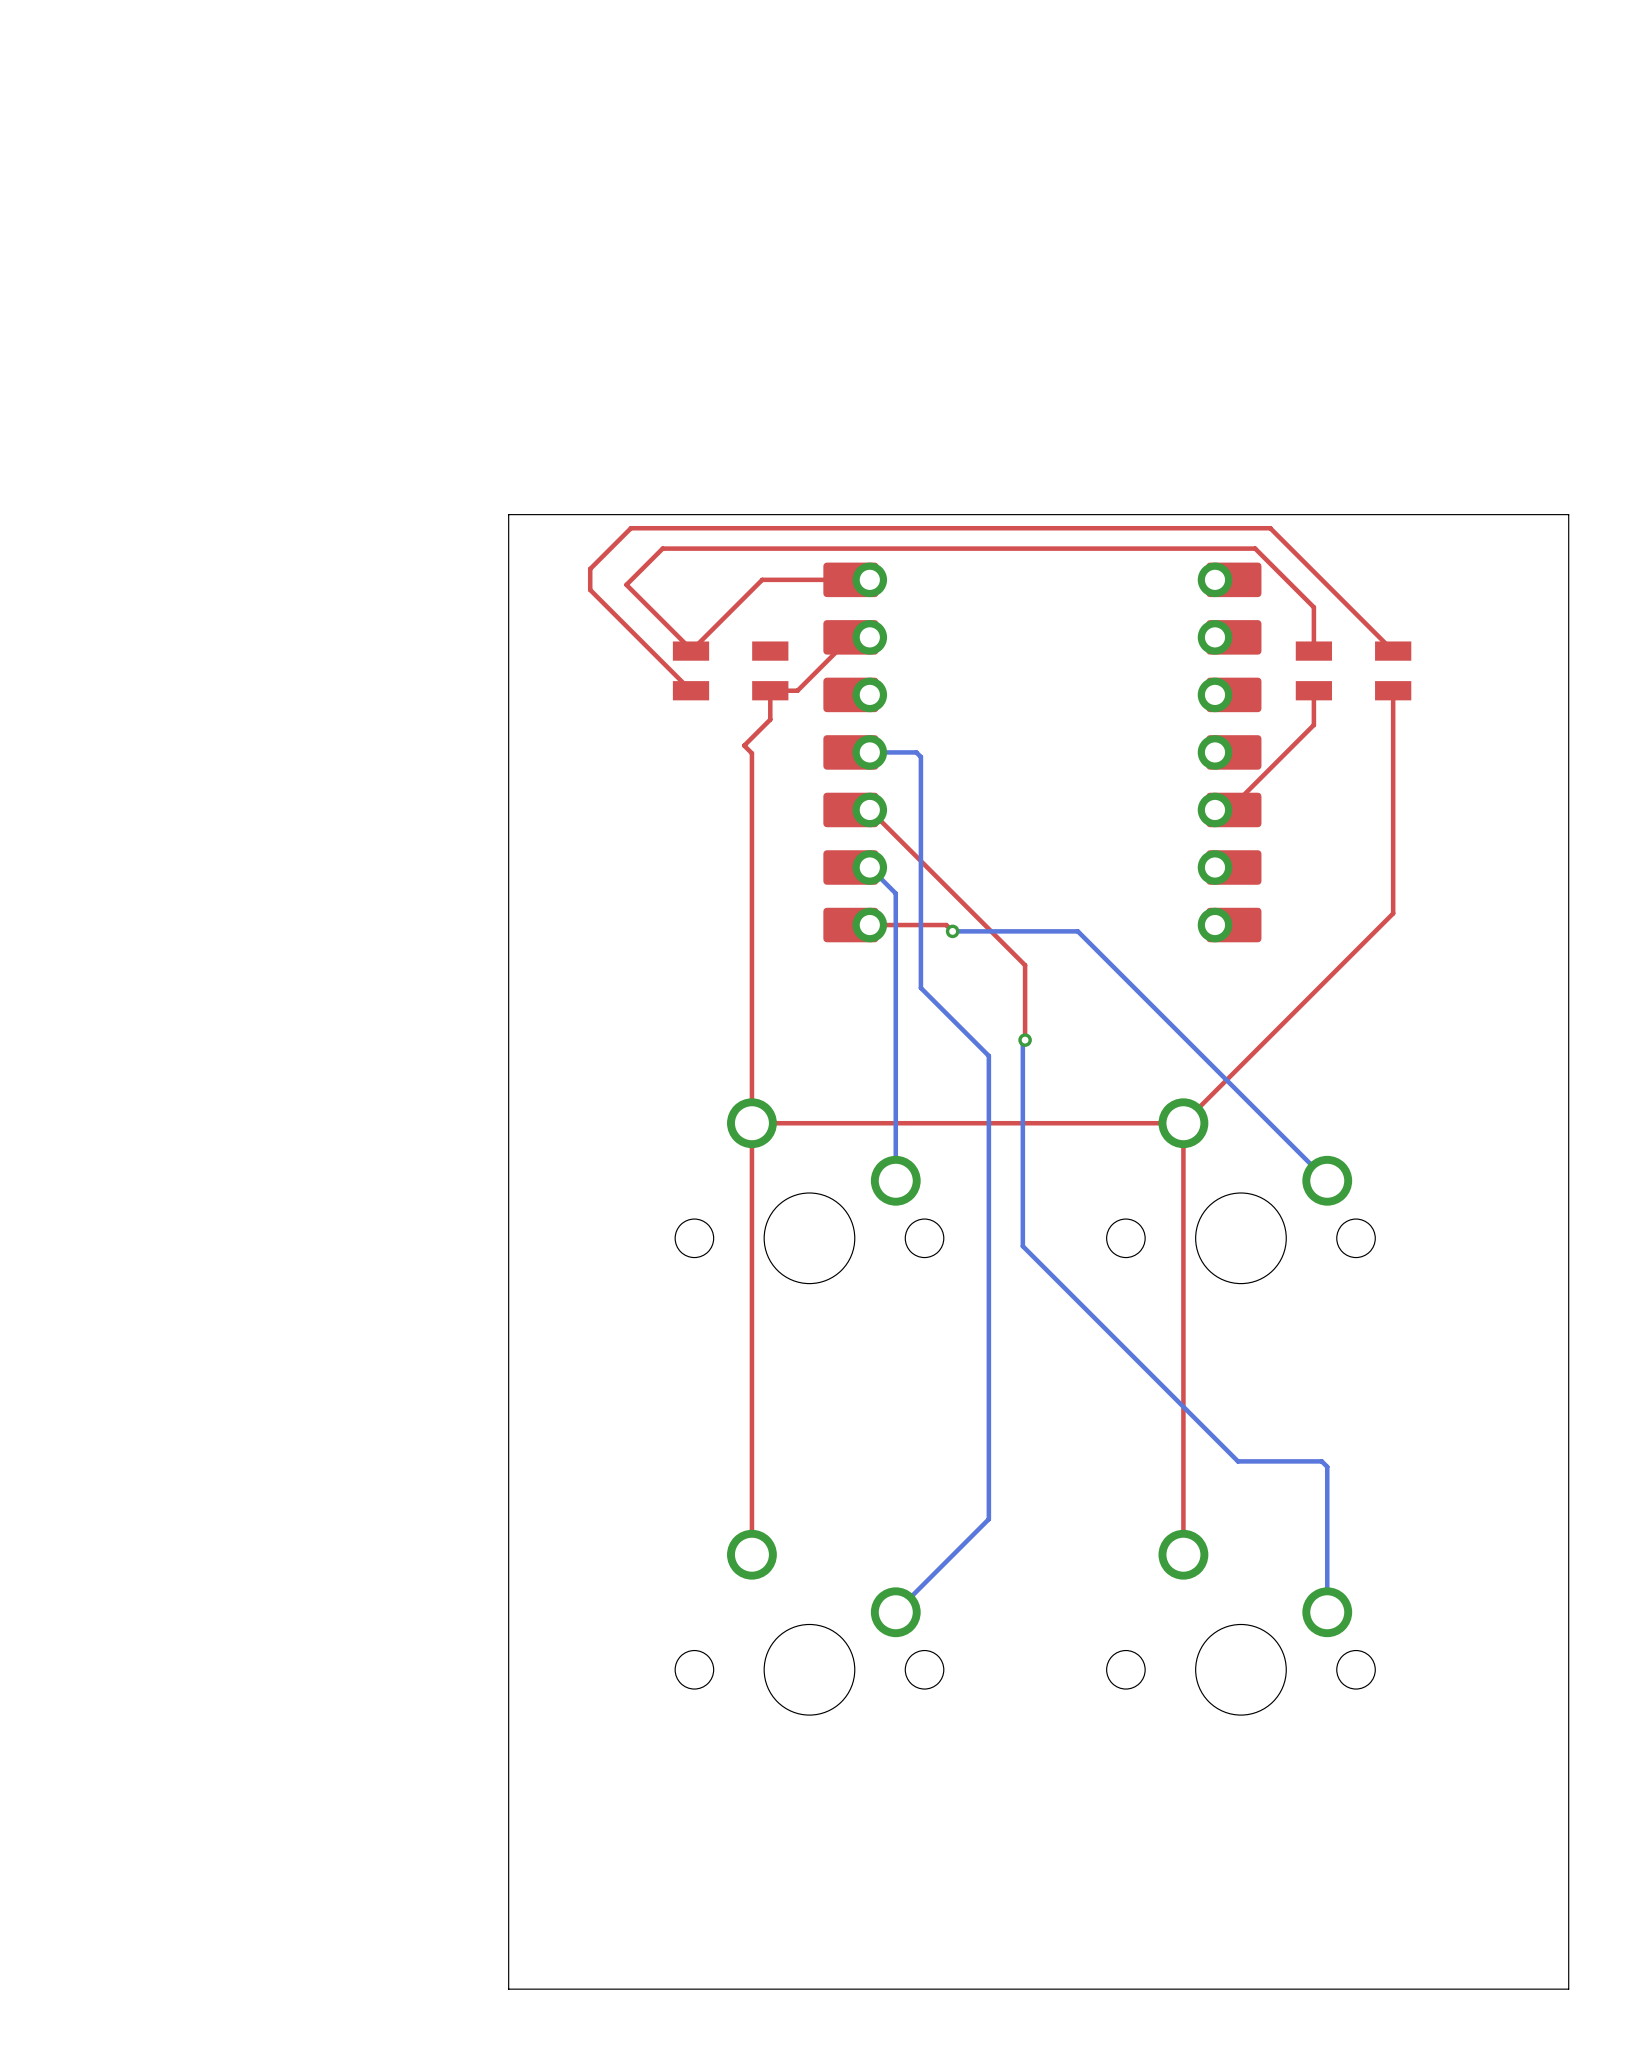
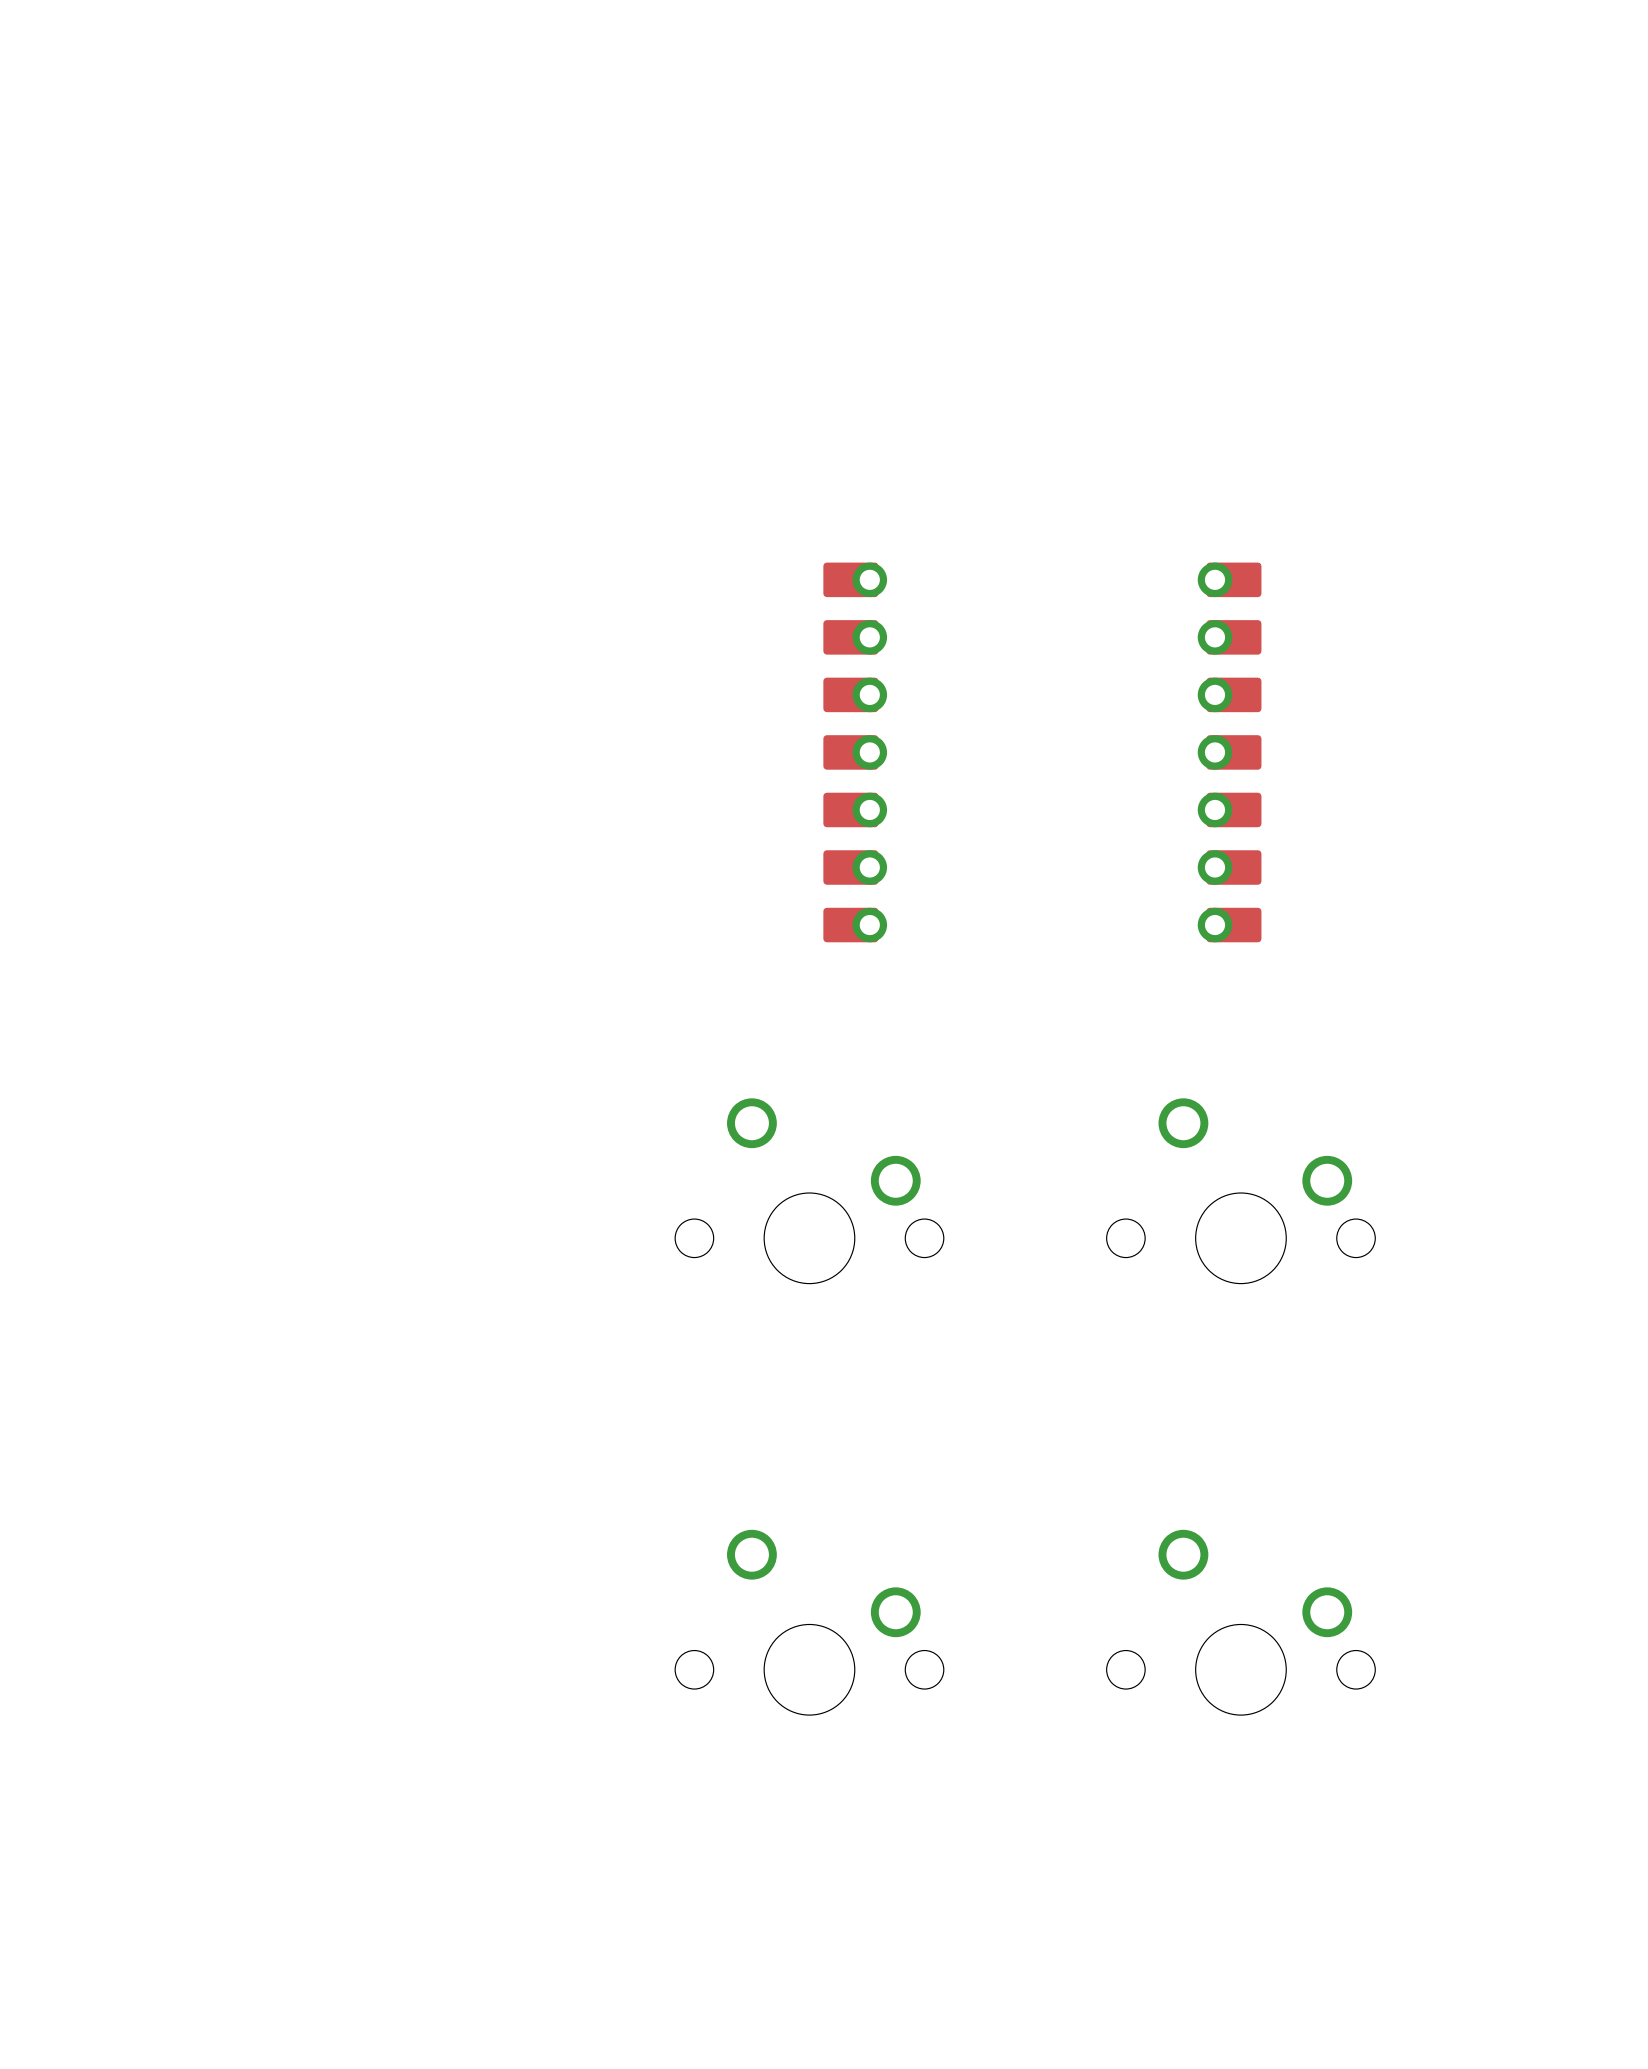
board edge: (1568, 514) (508, 514) (508, 1989) (1568, 1989) (1568, 514) -> none
top track: (869, 579) (762, 579) (691, 651) (626, 584) (662, 548) (1255, 548) (1313, 607) (1313, 651) -> none
top track: (850, 637) (797, 690) (770, 690) (770, 719) (744, 745) (751, 753) (751, 1554) -> none
top track: (1393, 651) (1270, 528) (630, 528) (590, 568) (590, 589) (691, 690) -> none
part: (730, 670) -> none
part: (1353, 670) -> none
top track: (1313, 690) (1313, 724) (1228, 809) (1215, 809) -> none
top track: (1393, 690) (1393, 913) (1183, 1123) -> none
bottom track: (869, 752) (916, 752) (920, 756) (920, 988) (988, 1055) (988, 1519) (895, 1612) -> none
top track: (869, 809) (1025, 965) (1025, 1040) -> none
bottom track: (869, 867) (895, 893) (895, 1180) -> none
top track: (869, 925) (946, 925) (952, 931) -> none
bottom track: (952, 931) (1077, 931) (1327, 1180) -> none
via: (952, 931) -> none
bottom track: (1025, 1040) (1022, 1042) (1022, 1246) (1238, 1461) (1321, 1461) (1327, 1466) (1327, 1612) (1328, 1610) -> none
via: (1025, 1040) -> none
top track: (1183, 1123) (751, 1123) -> none
top track: (1183, 1123) (1183, 1554) -> none

